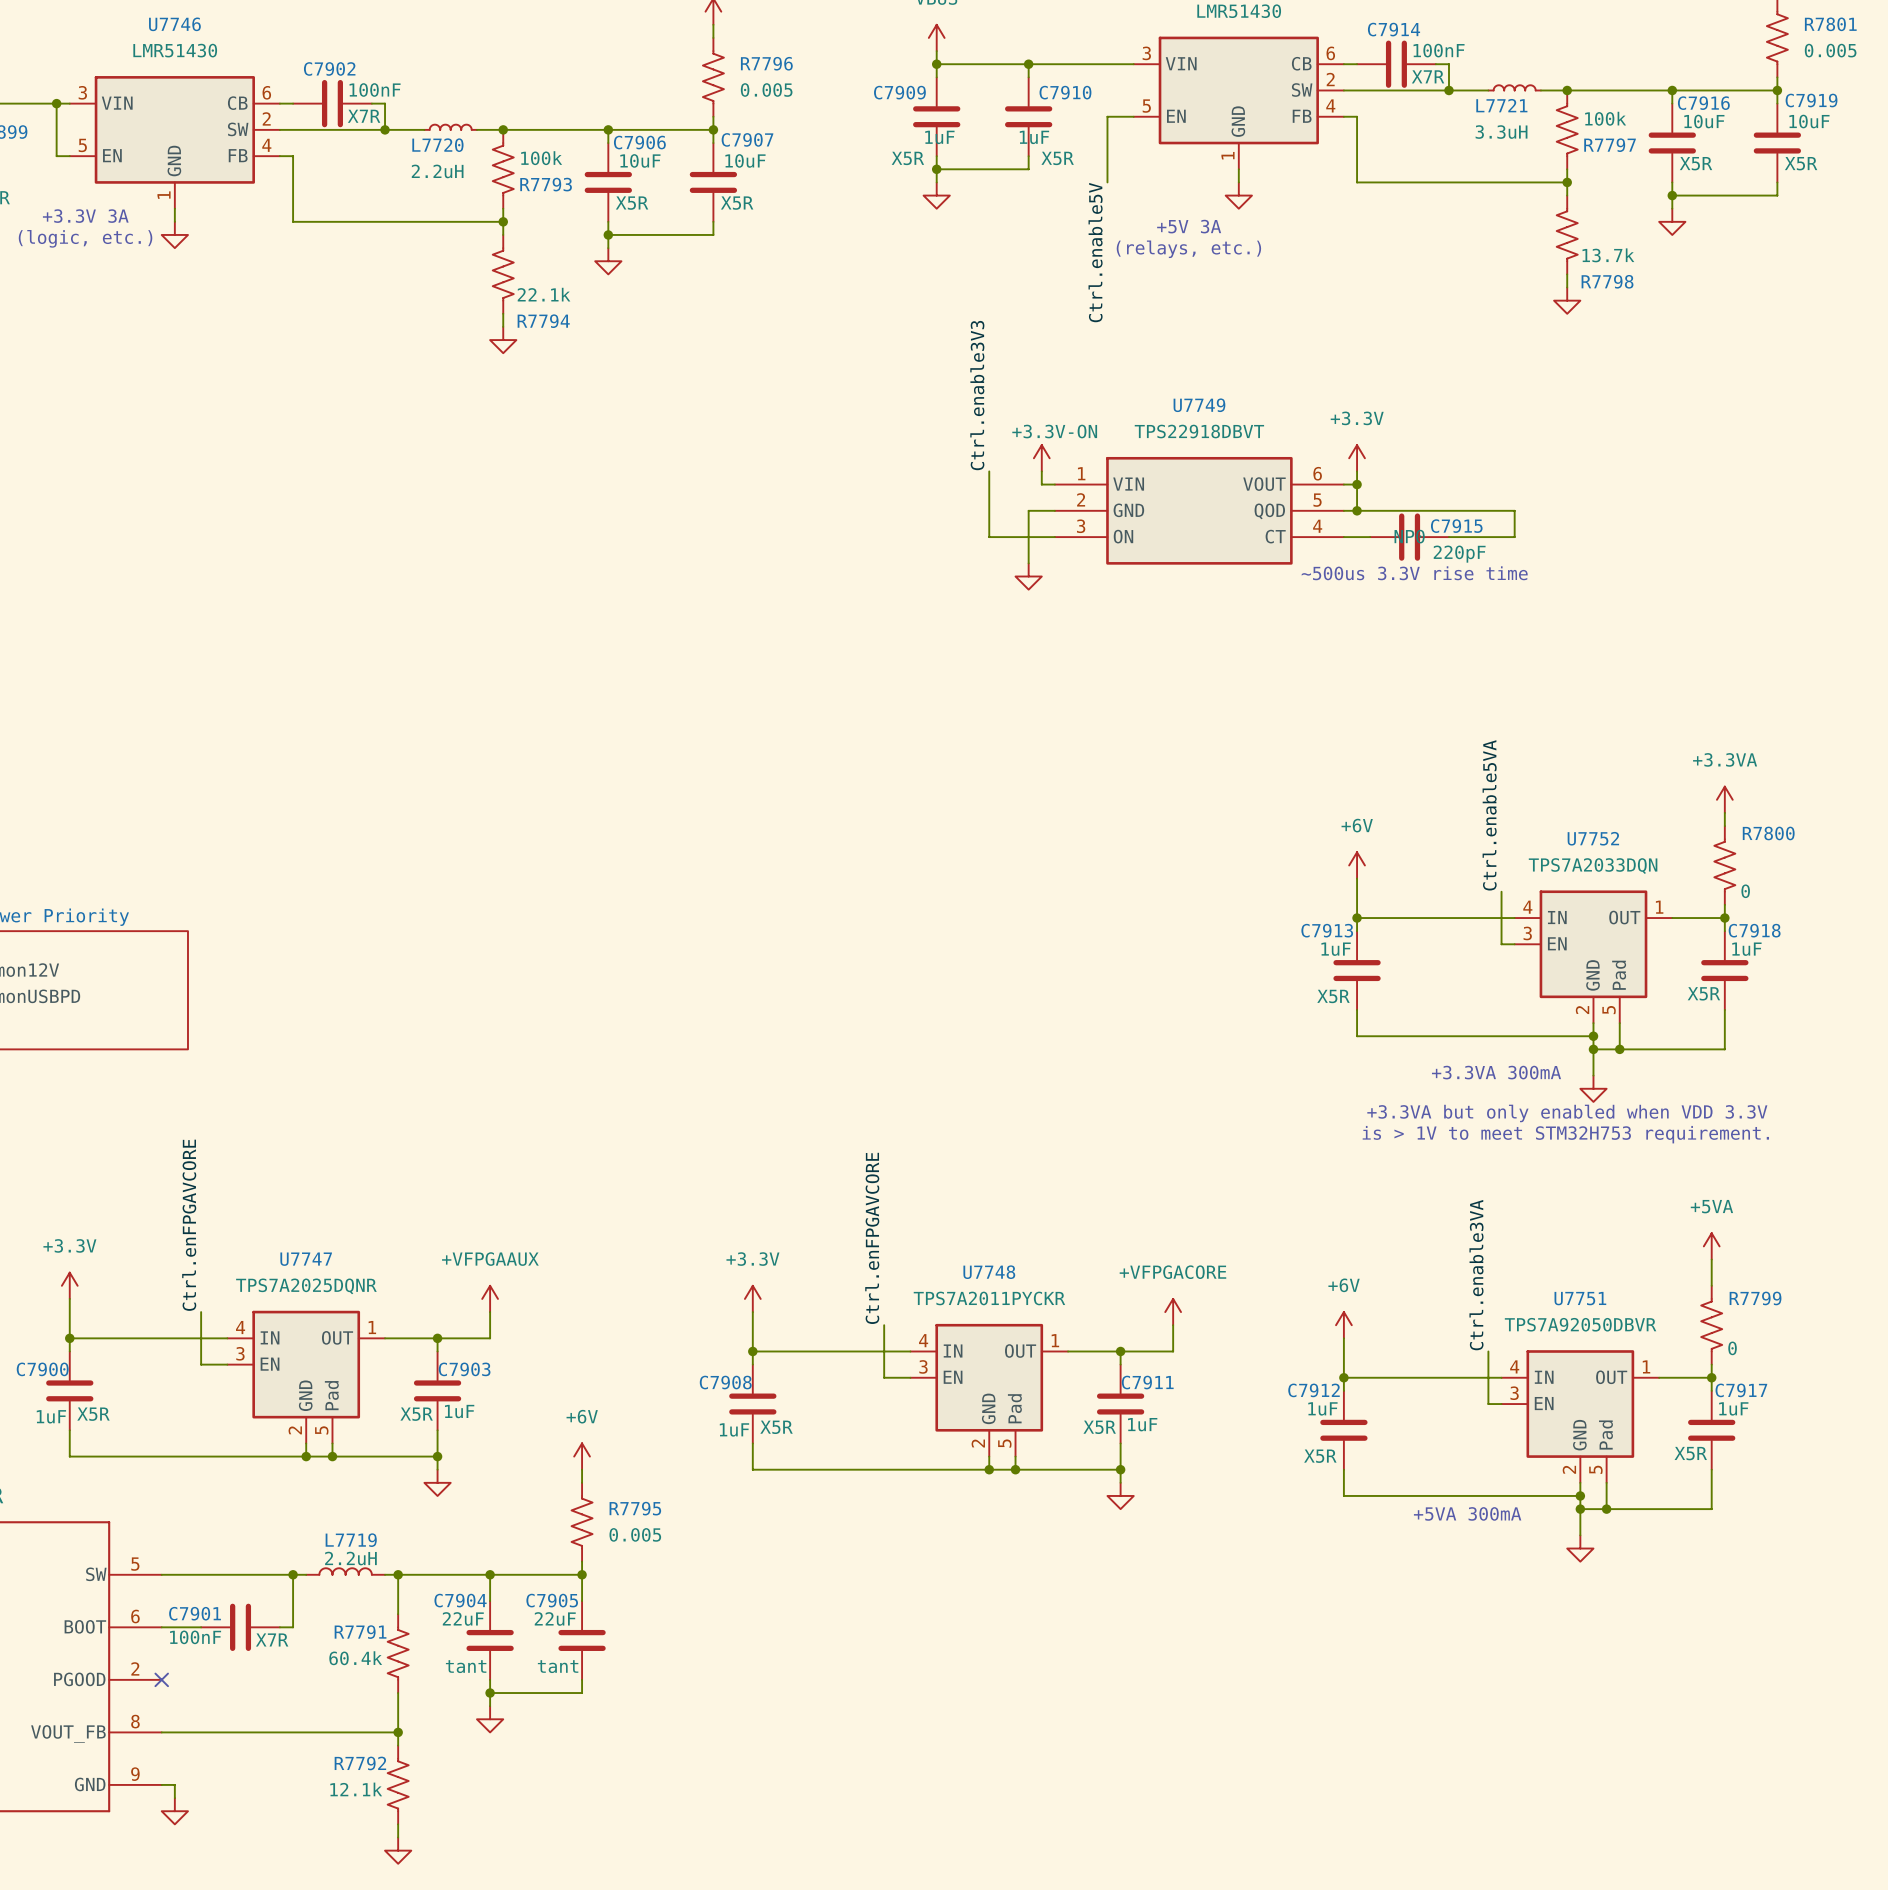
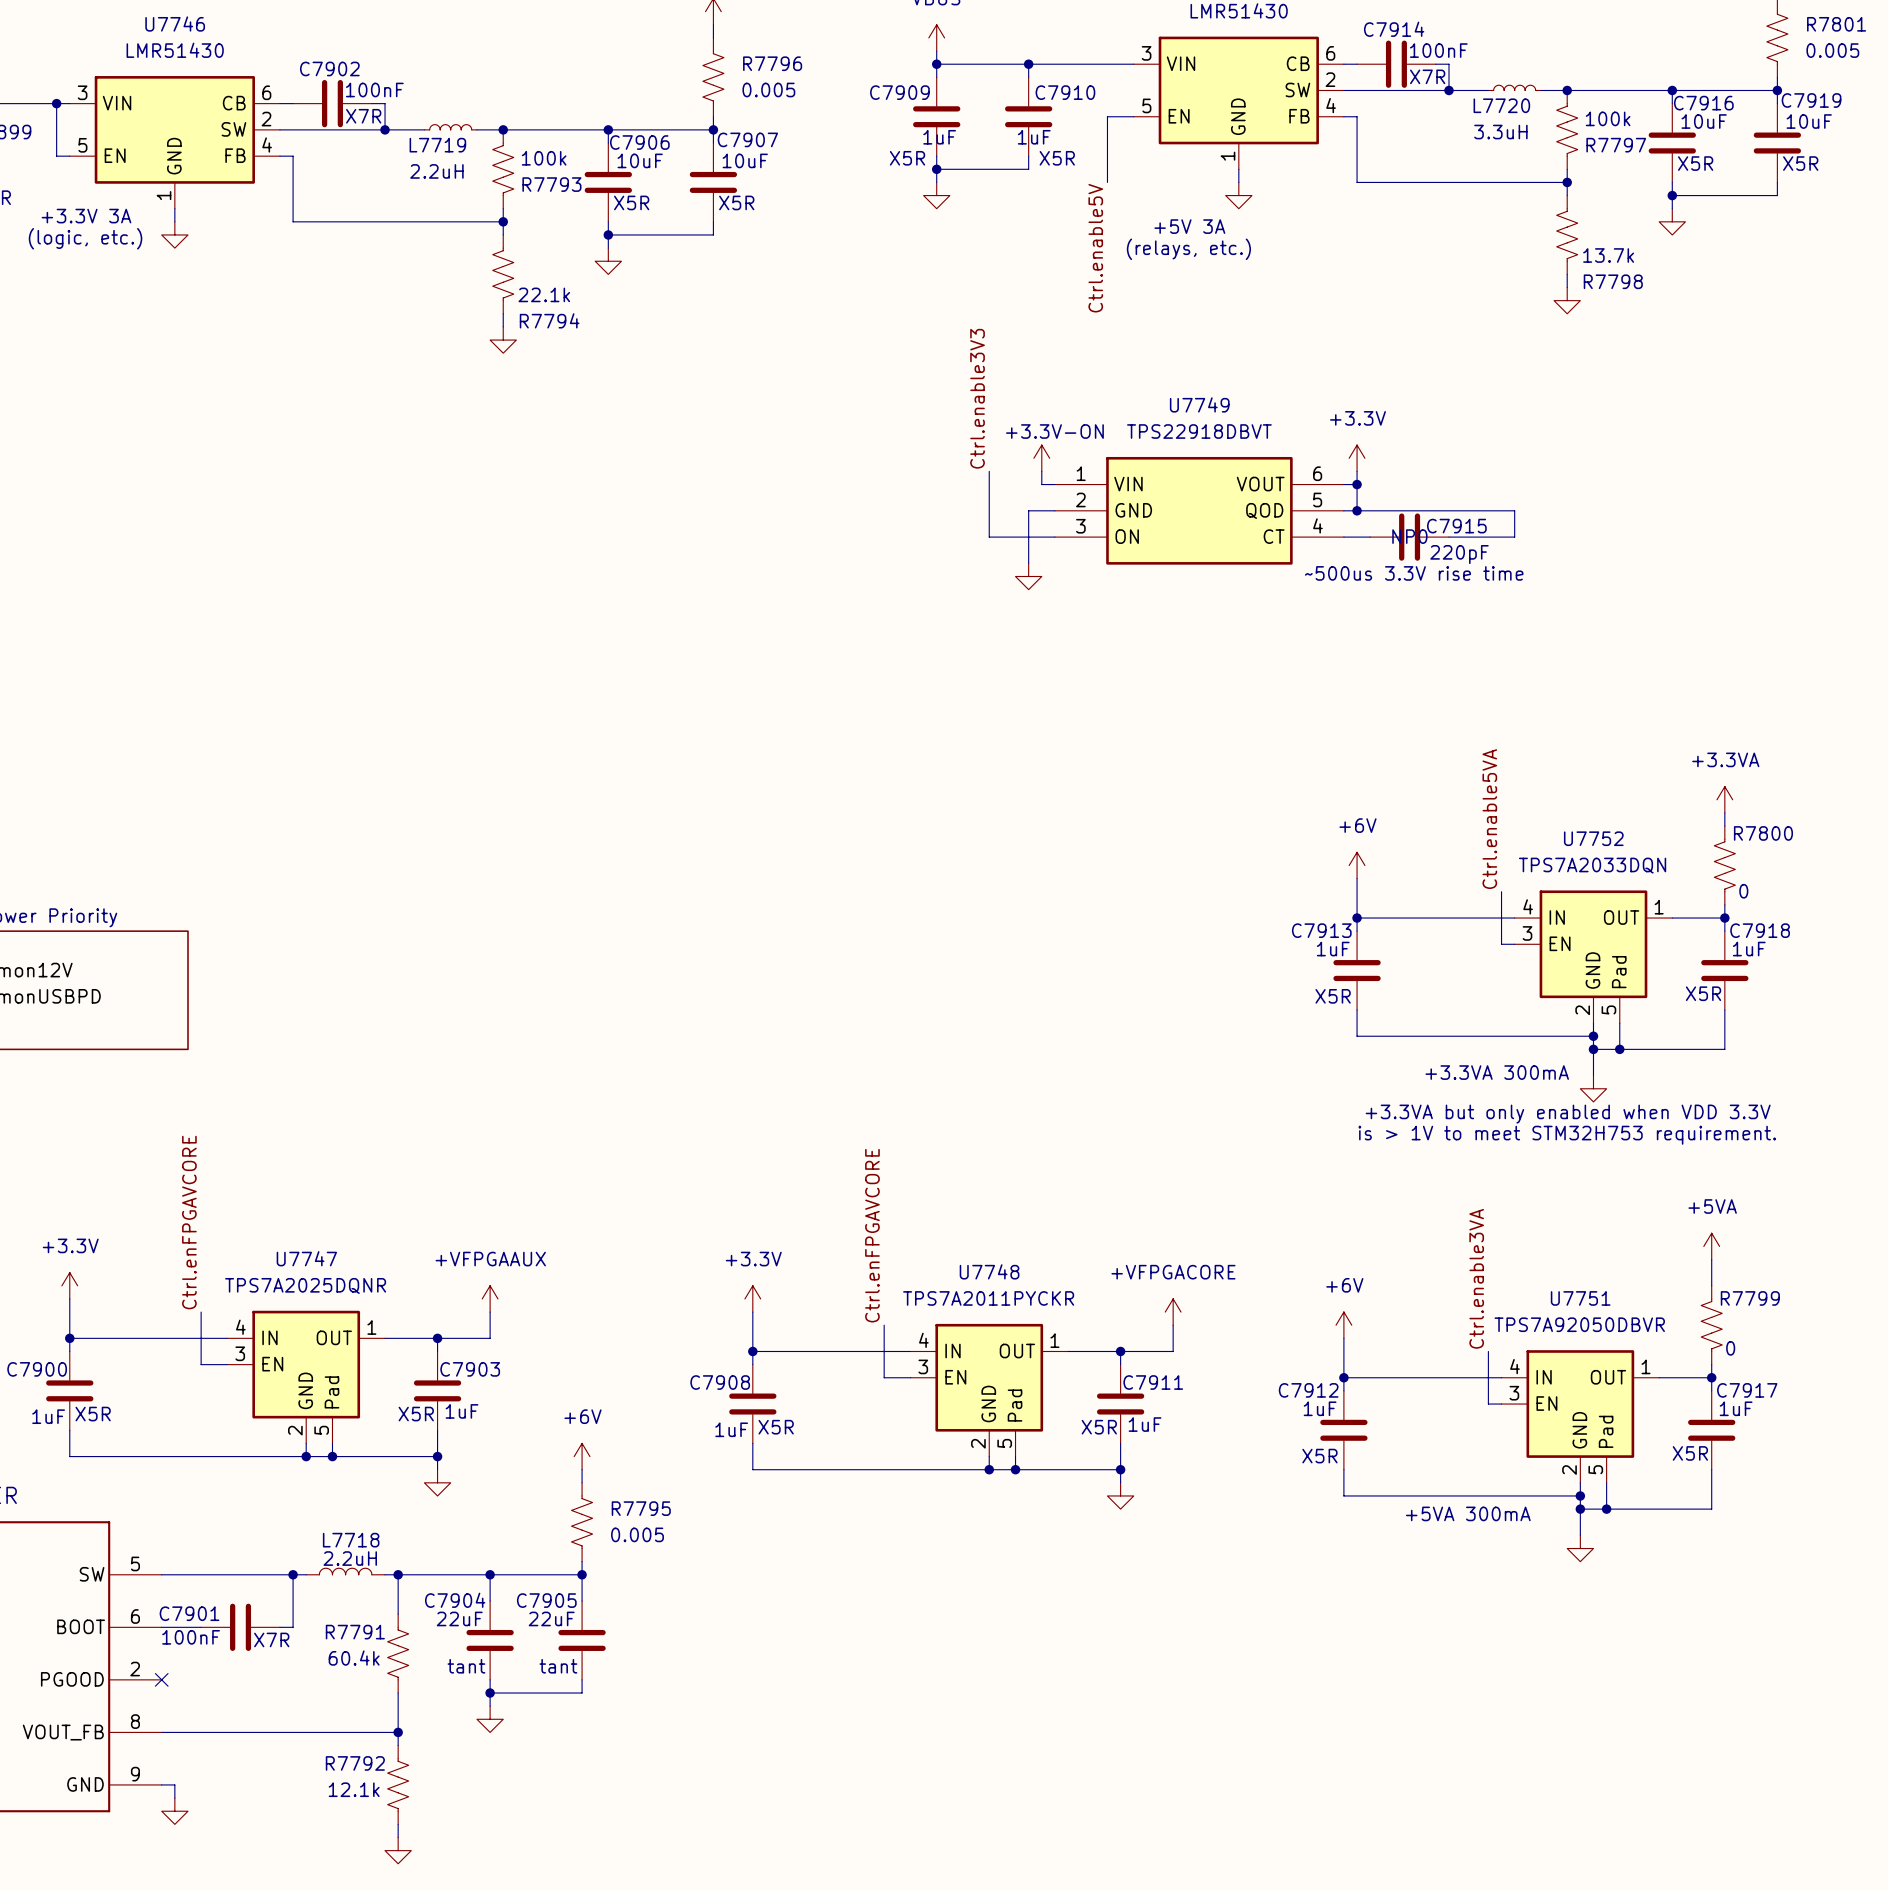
L7721 name: L7721 (1501, 105) -> L7720 (1501, 105)
L7720 name: L7720 (437, 145) -> L7719 (437, 145)
L7719 name: L7719 (351, 1540) -> L7718 (351, 1540)

